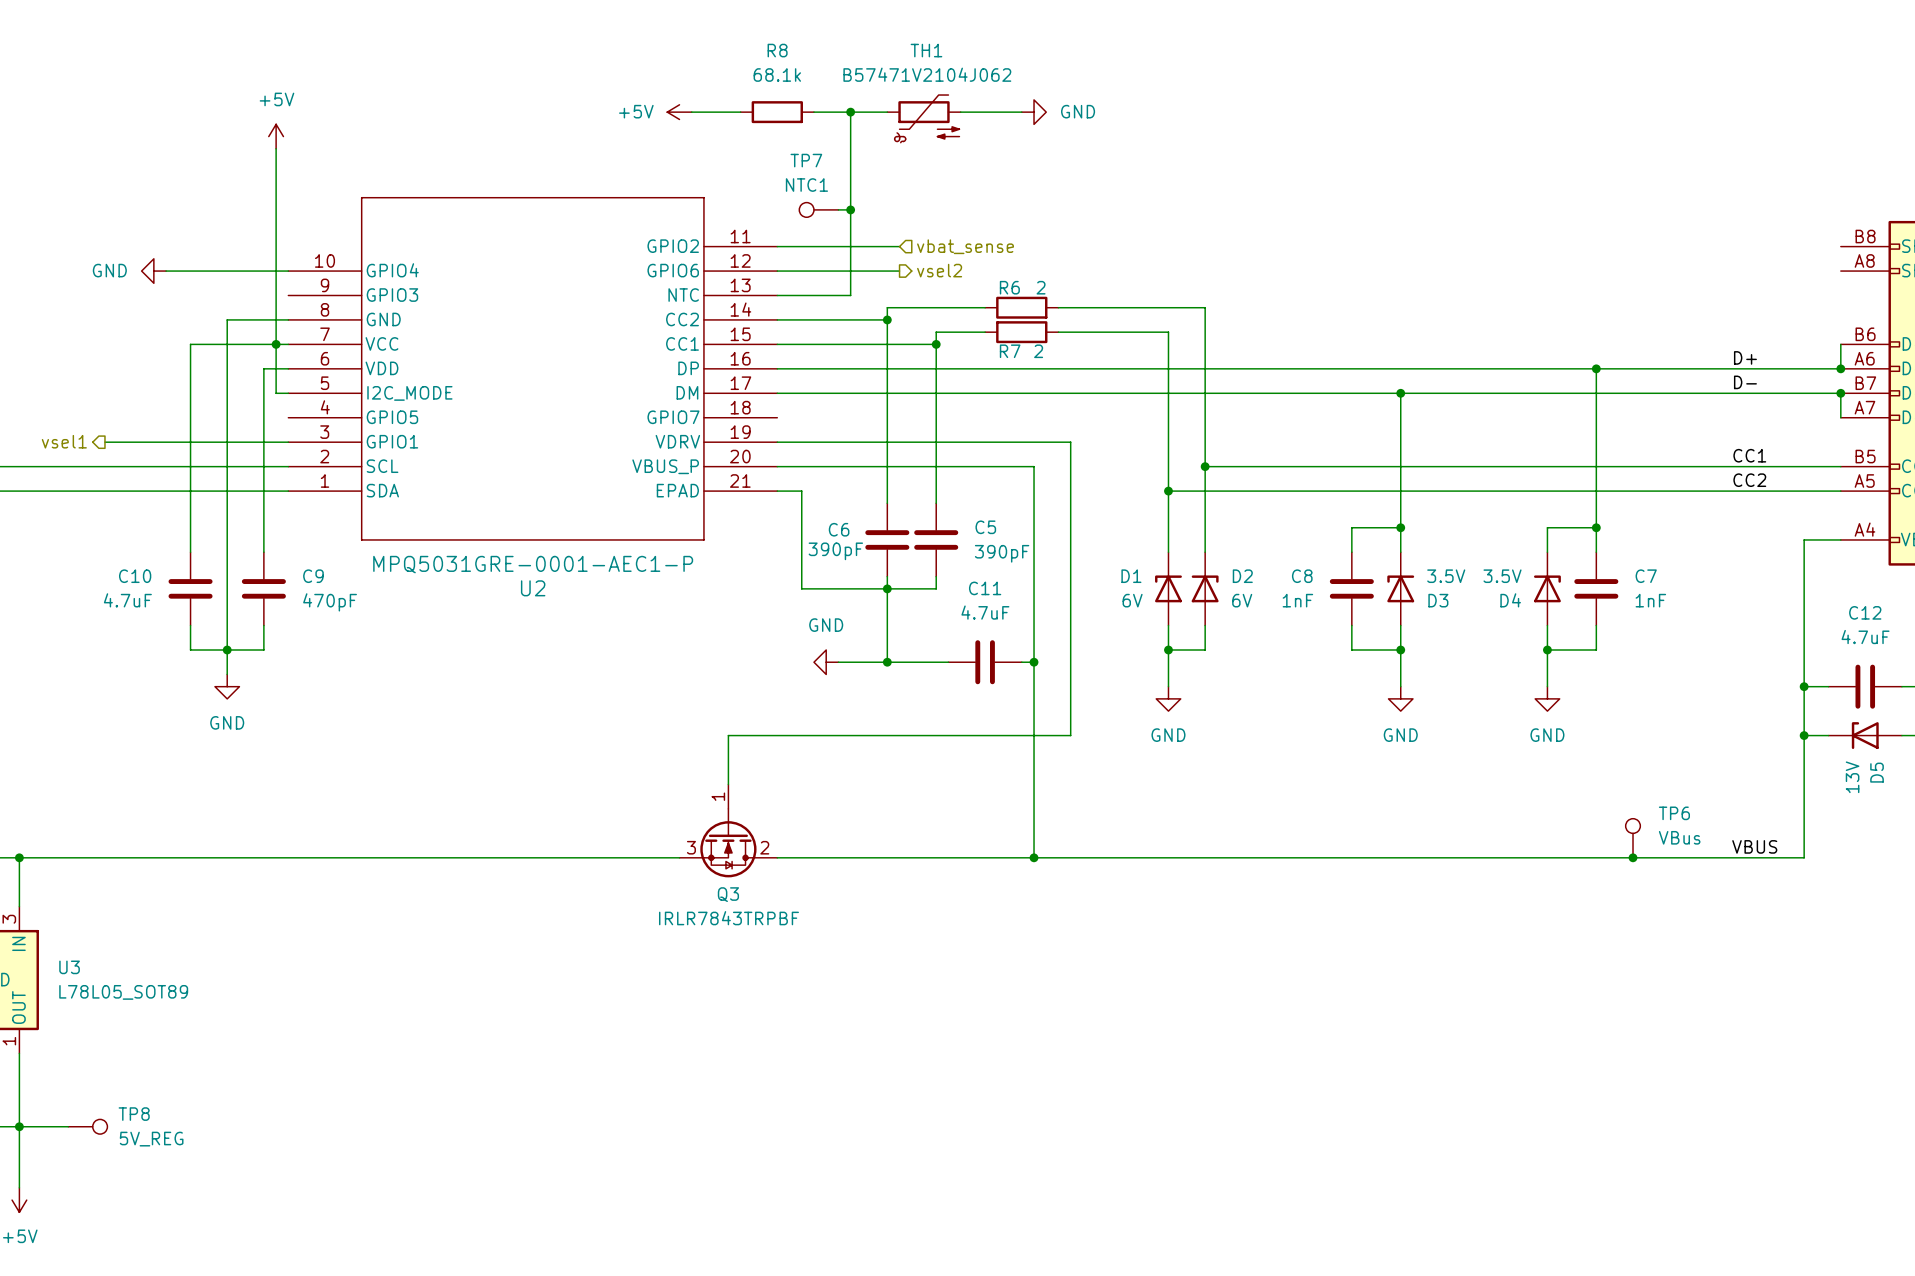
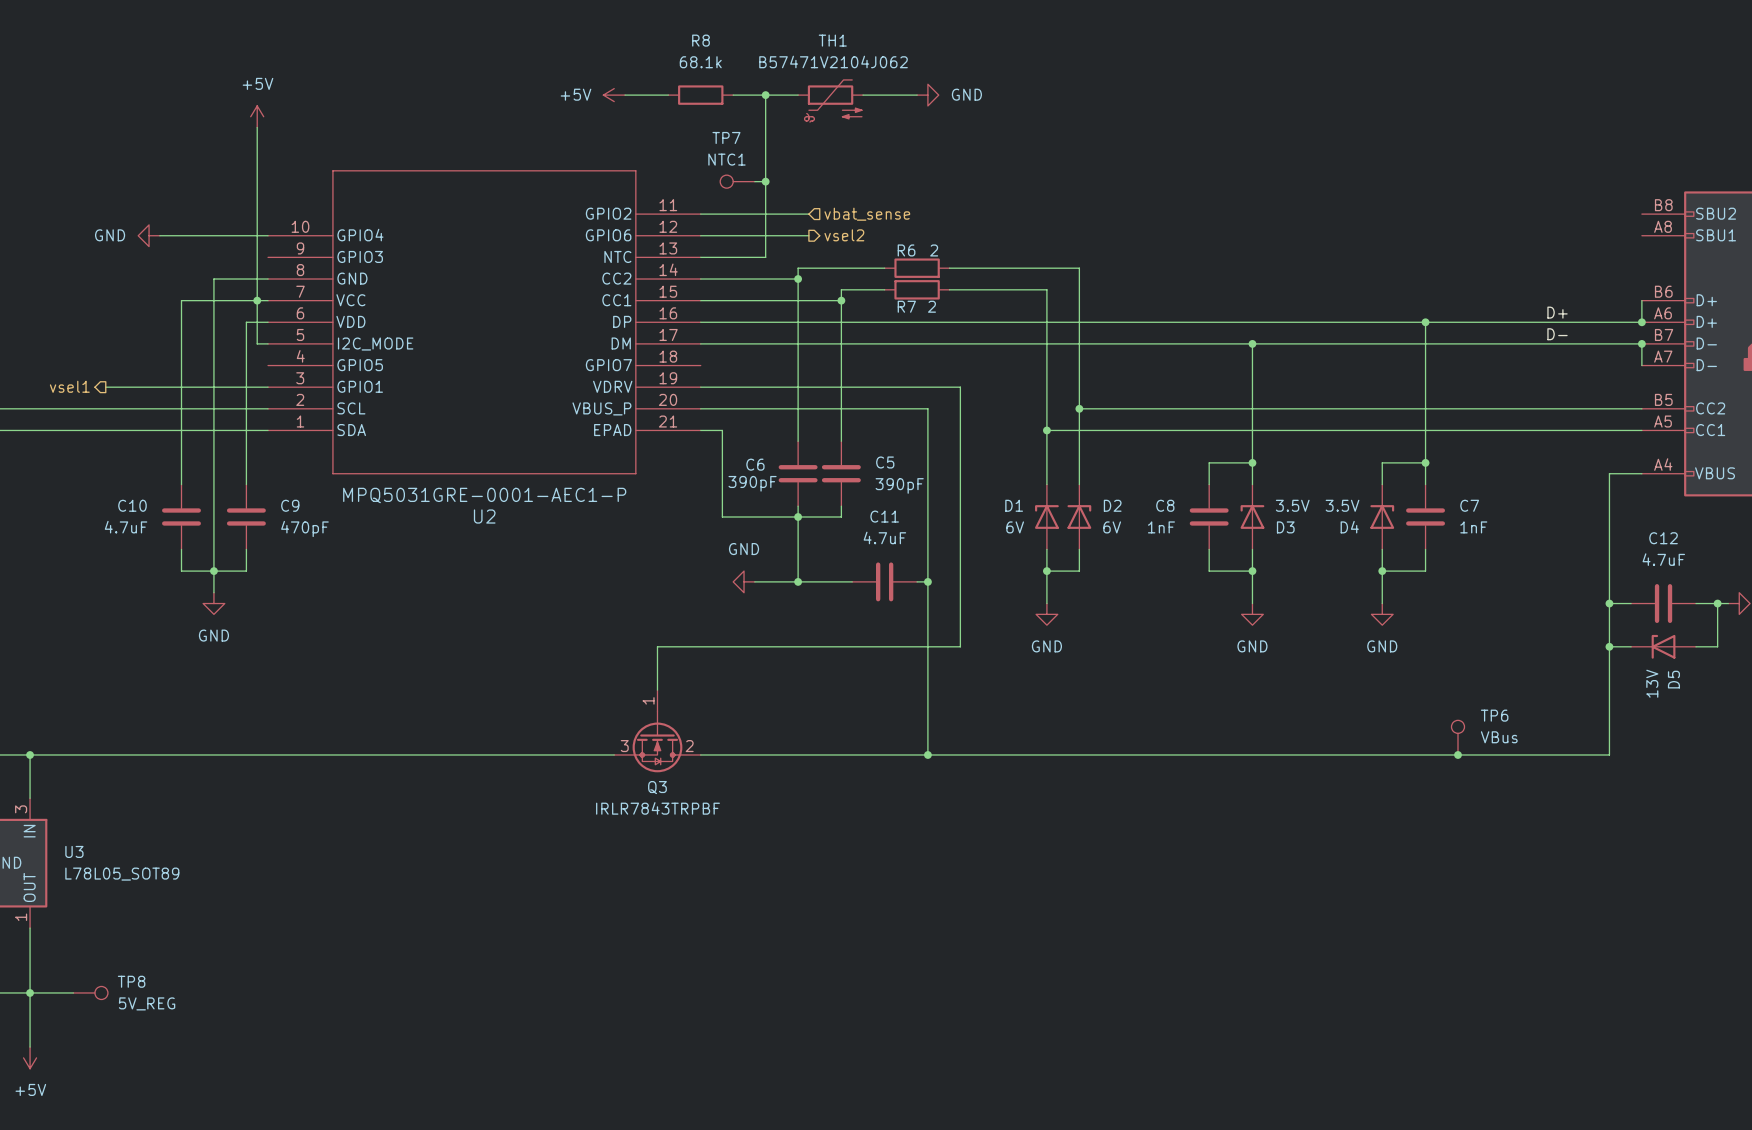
label: CC1 (1749, 455) -> none
label: CC2 (1749, 480) -> none
label: VBUS (1754, 846) -> none

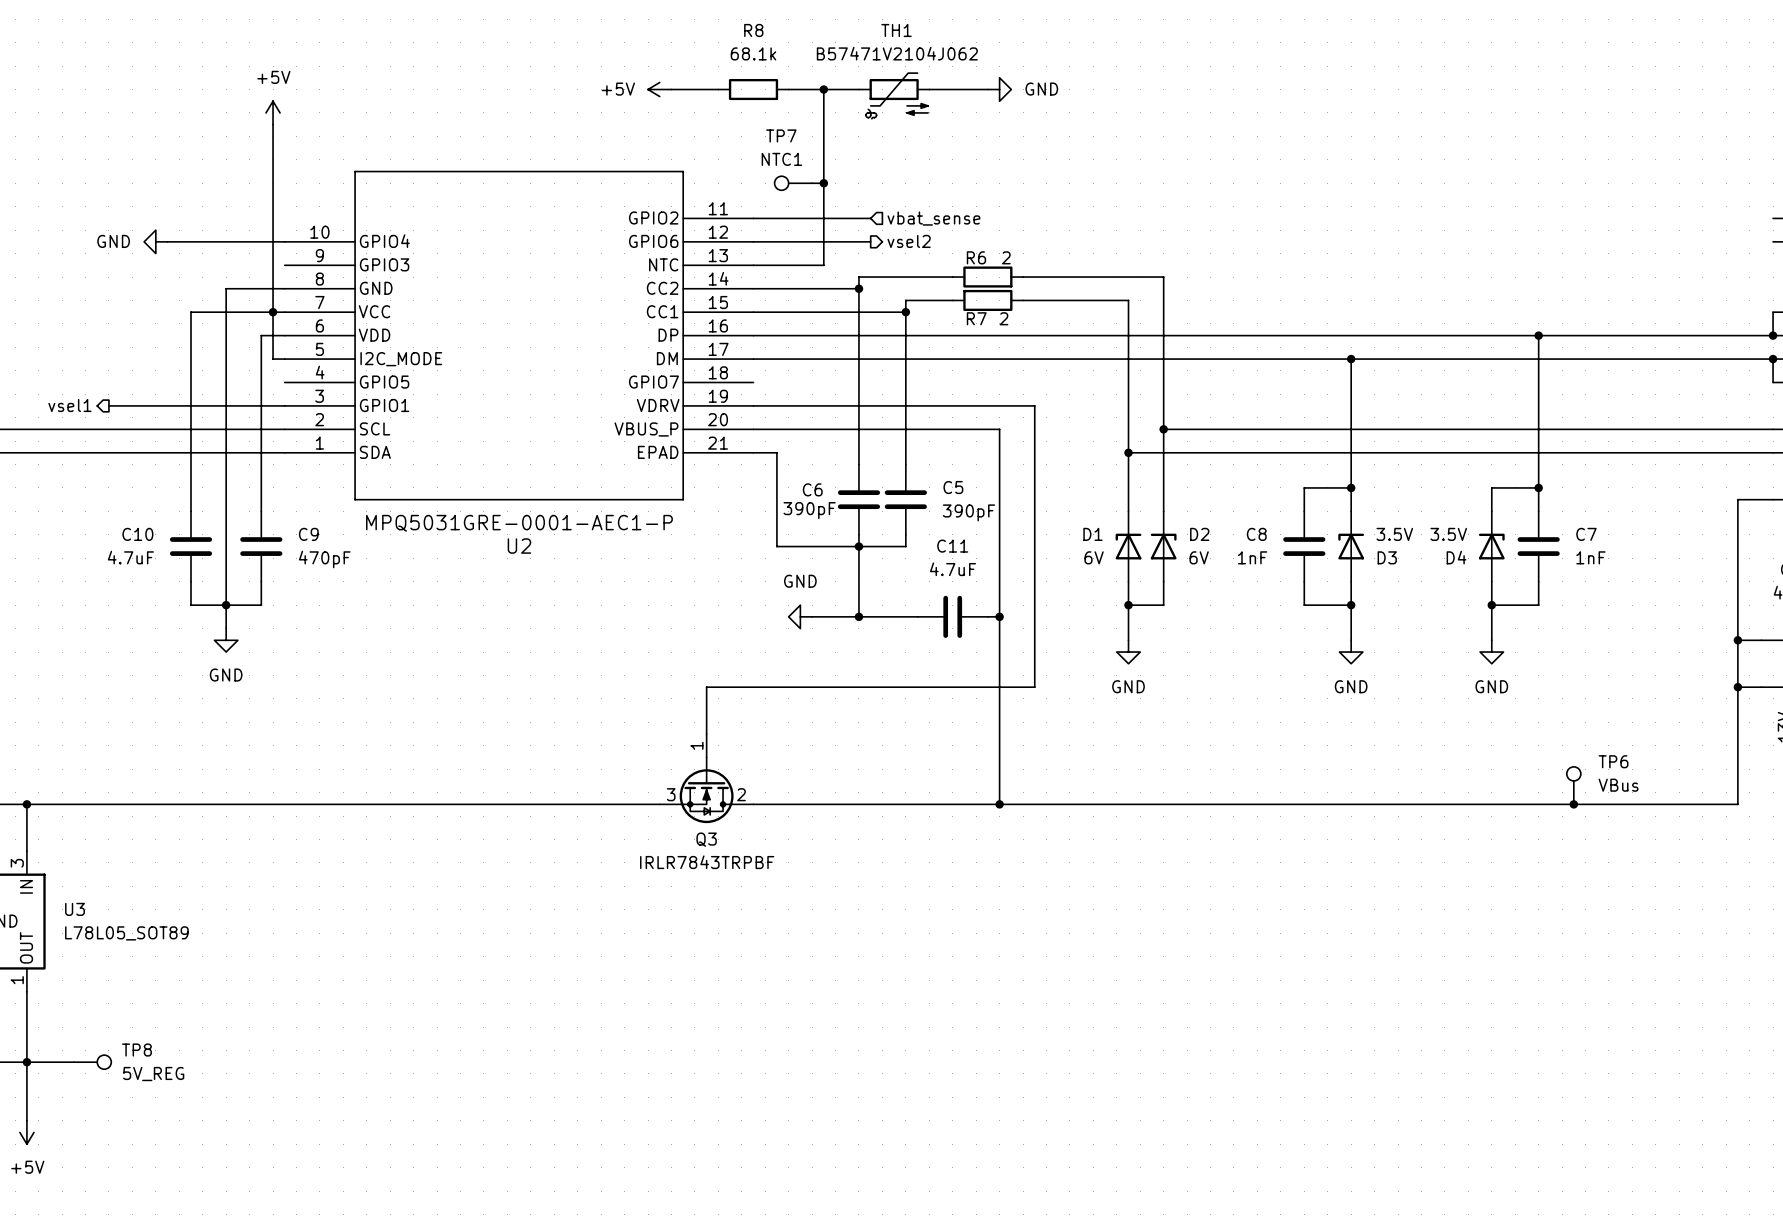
label: D+ (1557, 312) -> none
label: D- (1557, 334) -> none

